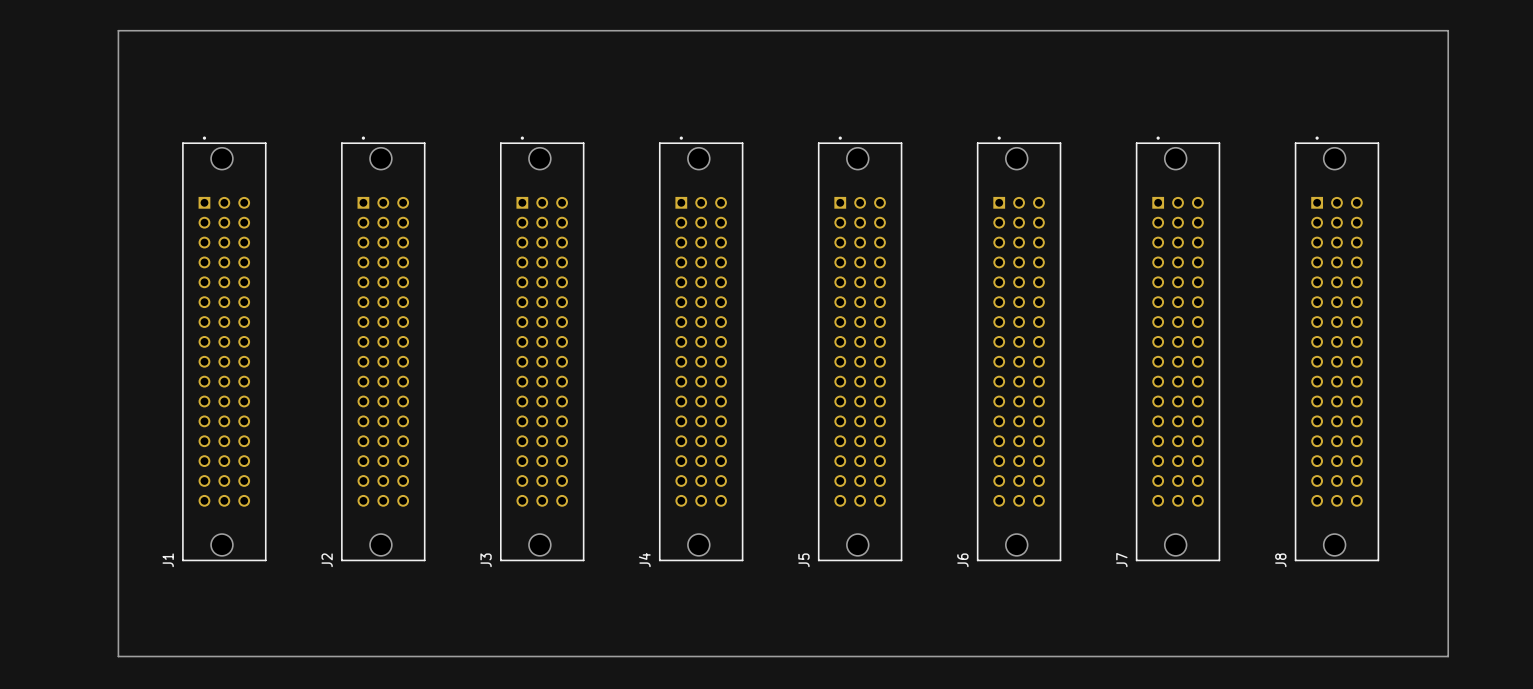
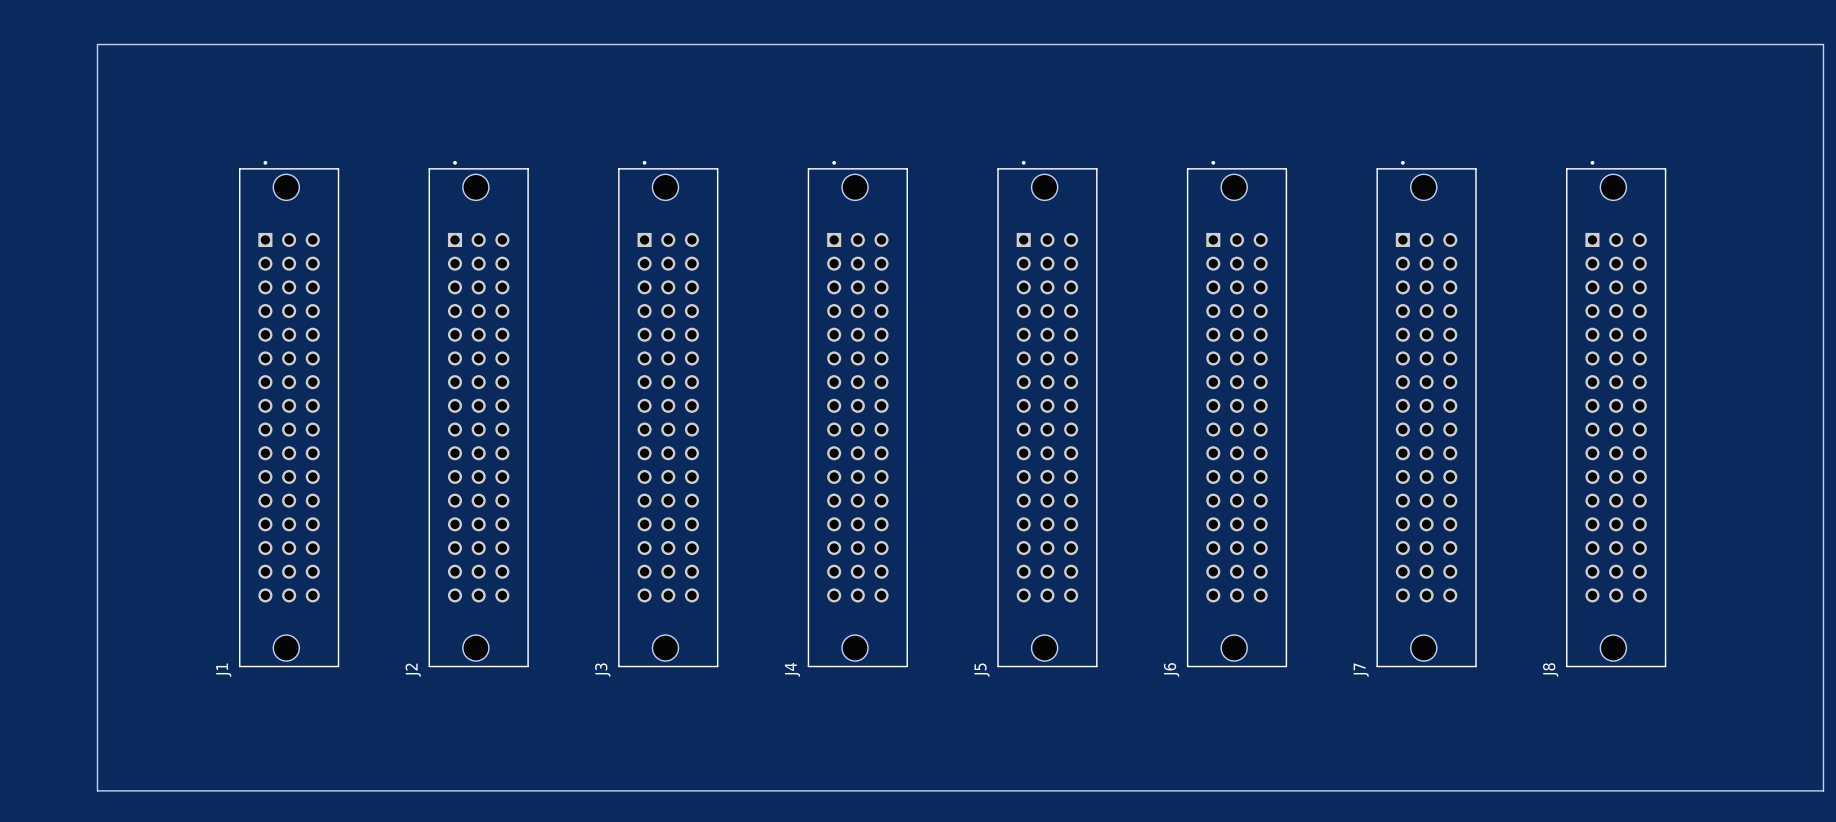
board edge: (118, 30) (1448, 30) (1448, 656) (118, 656) (118, 30) -> (97, 44) (97, 790) (1823, 790) (1823, 44) (97, 44)

